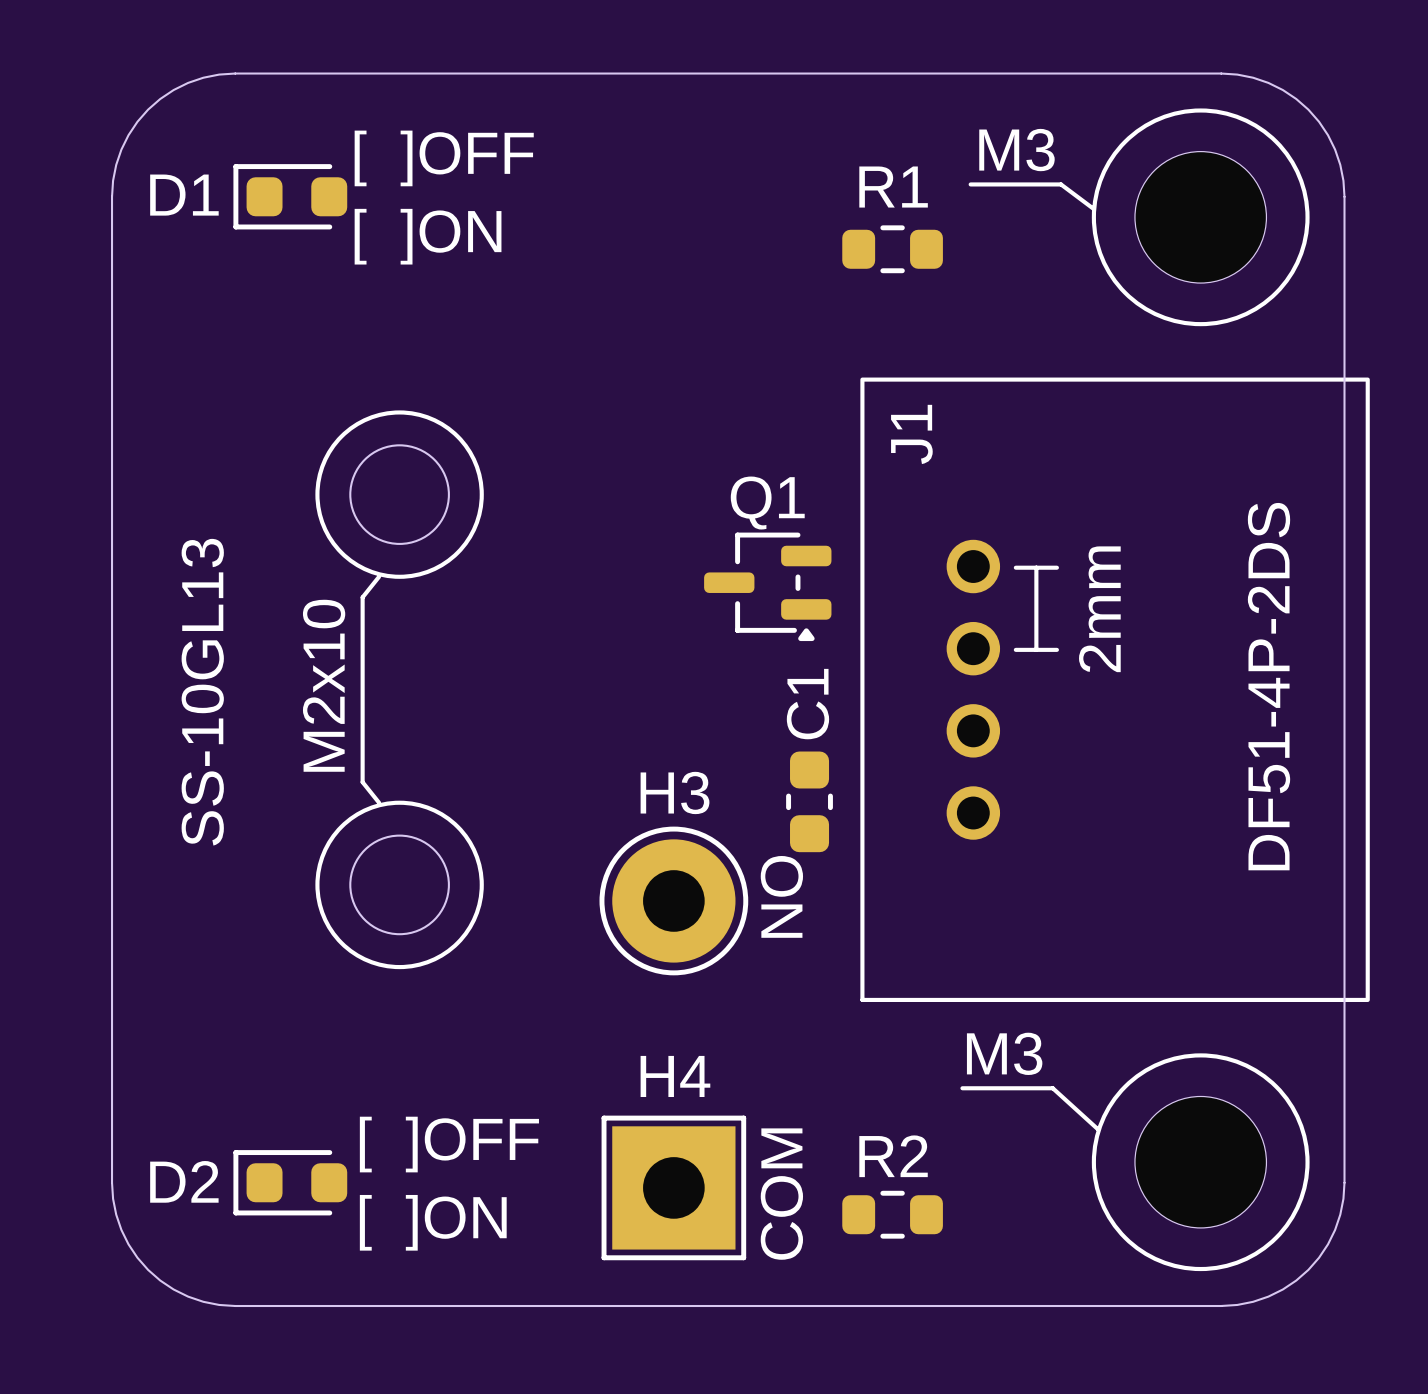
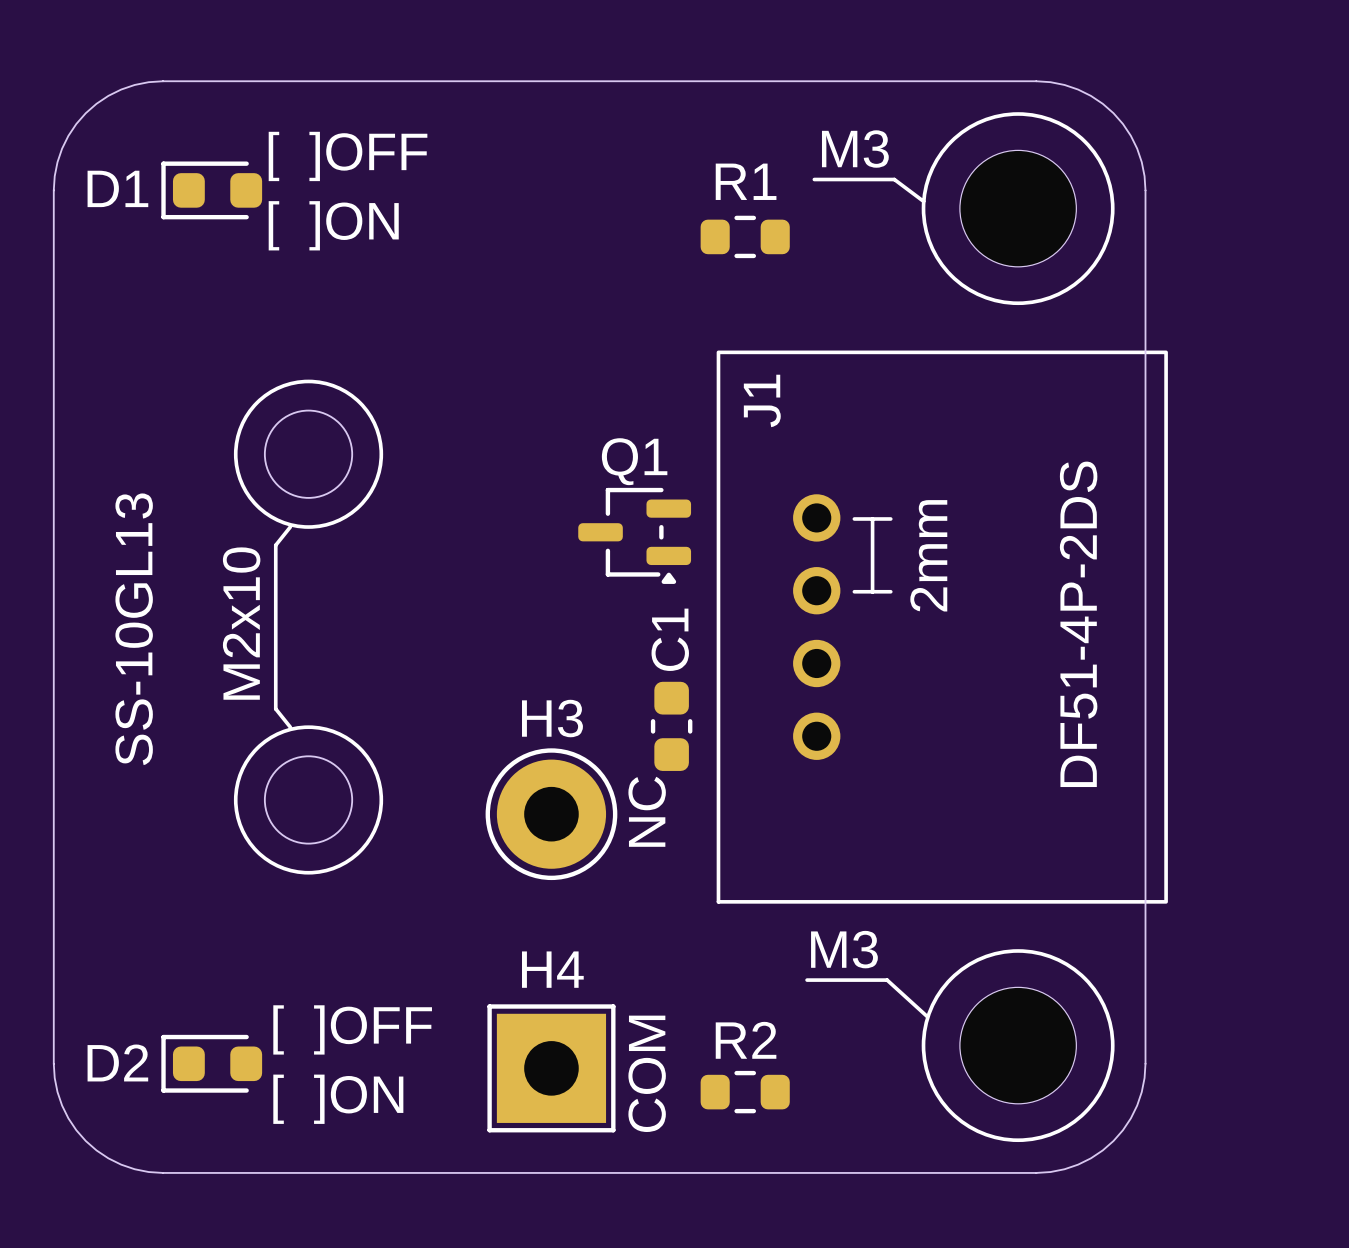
text: NO (781, 896) -> NC (647, 811)

